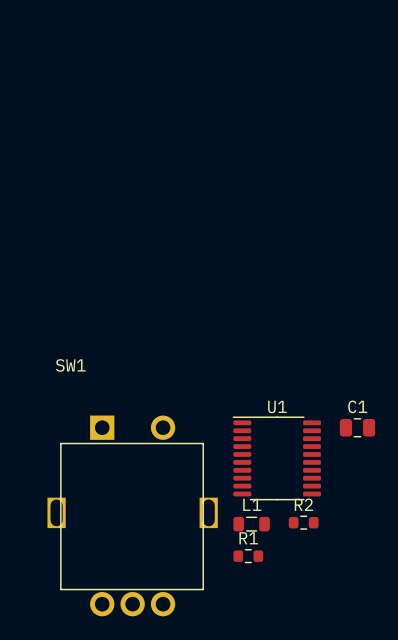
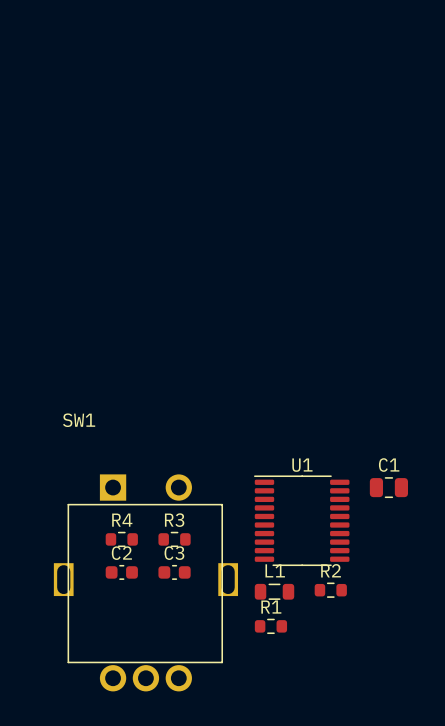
R4: none -> (121, 539)
R3: none -> (174, 539)
C2: none -> (121, 572)
C3: none -> (174, 572)

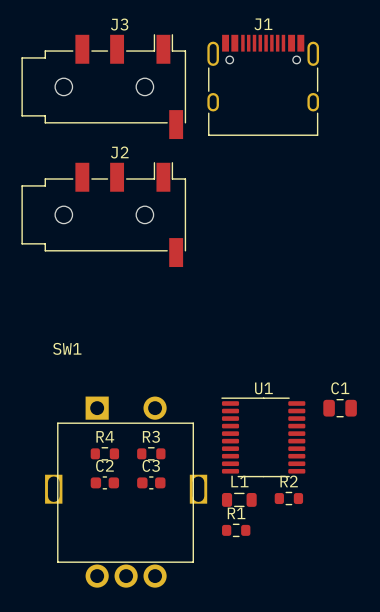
J1: none -> (263, 85)
J3: none -> (103, 86)
J2: none -> (103, 214)

